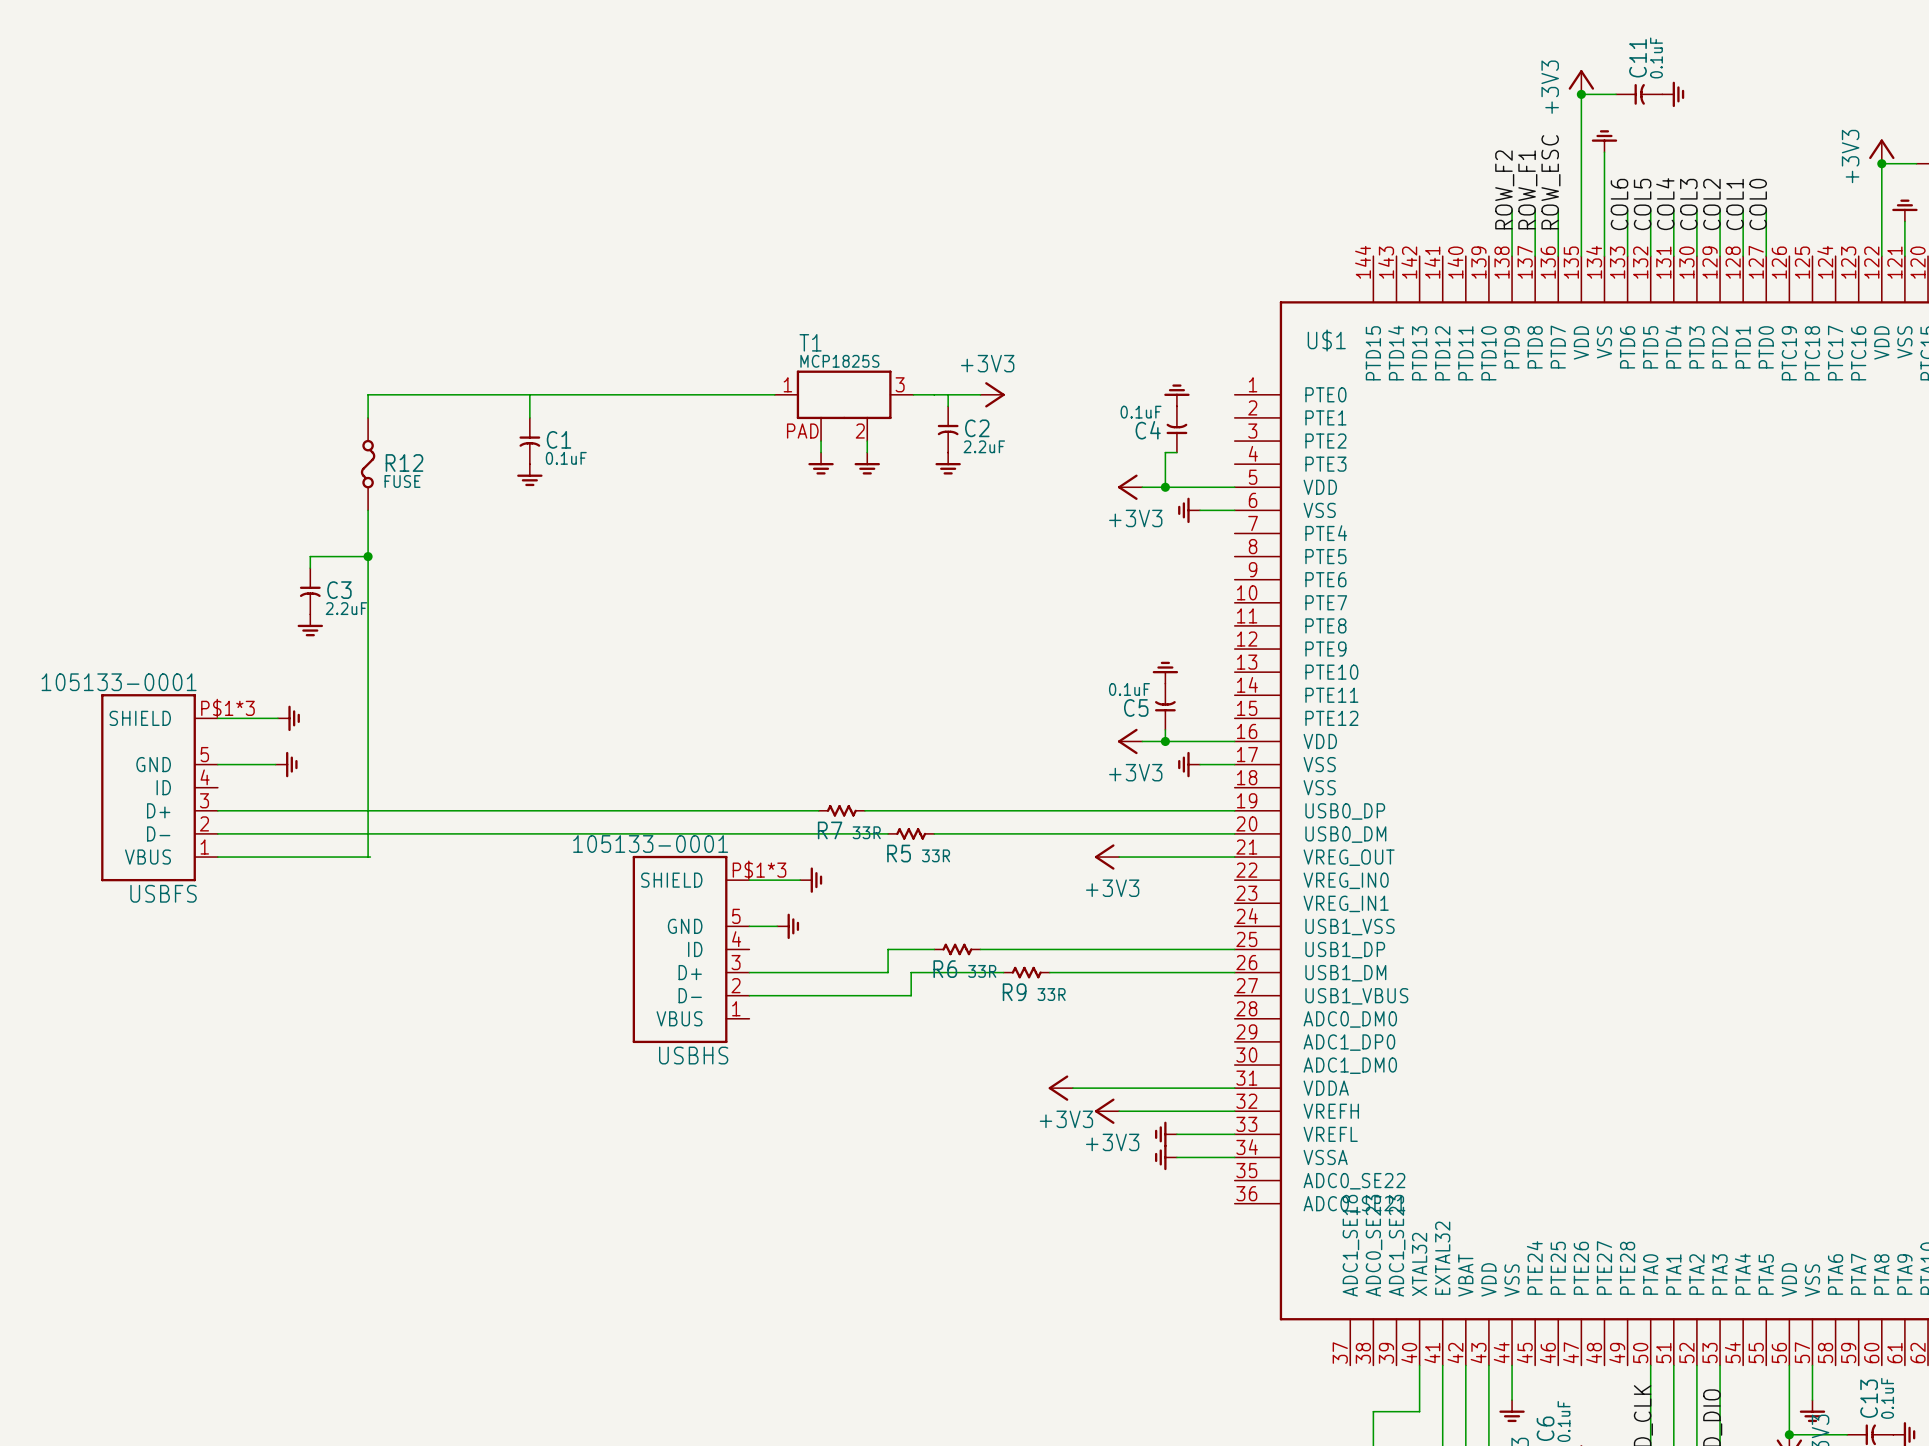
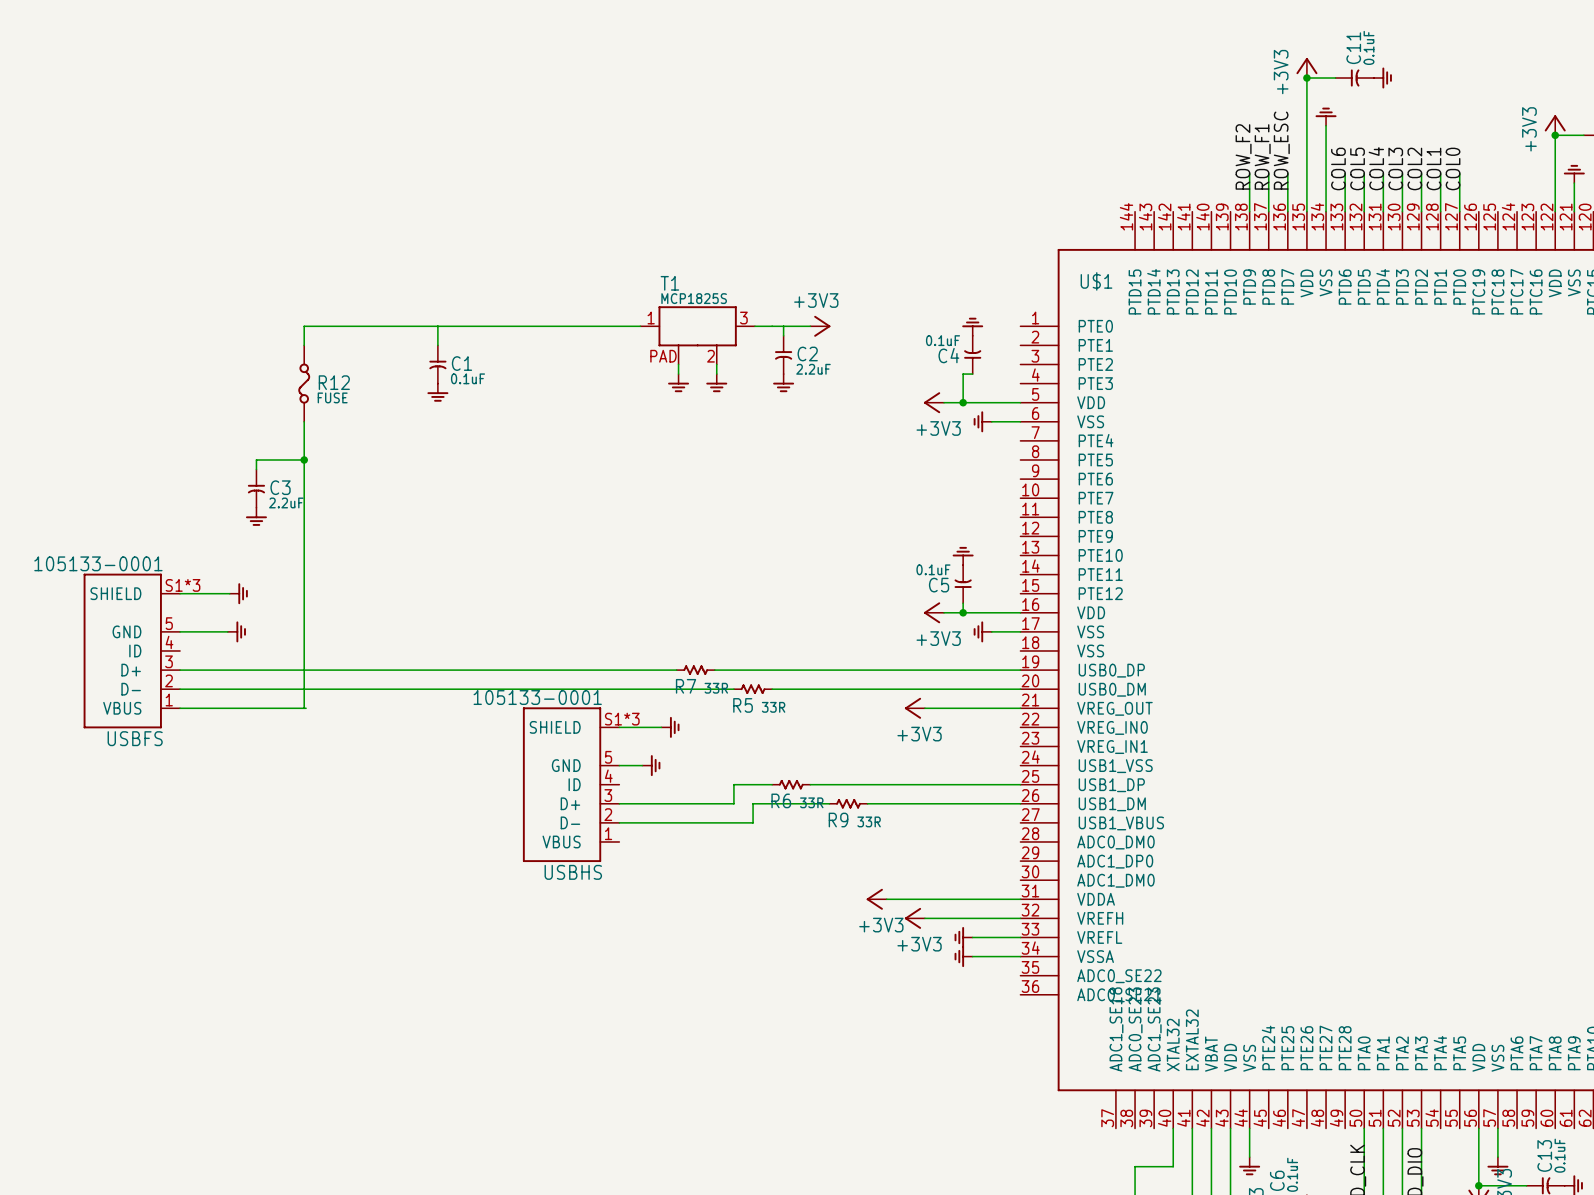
USBFS pin number: P$1*3 (227, 708) -> S1*3 (183, 585)
USBHS pin number: P$1*3 (759, 870) -> S1*3 (622, 719)

